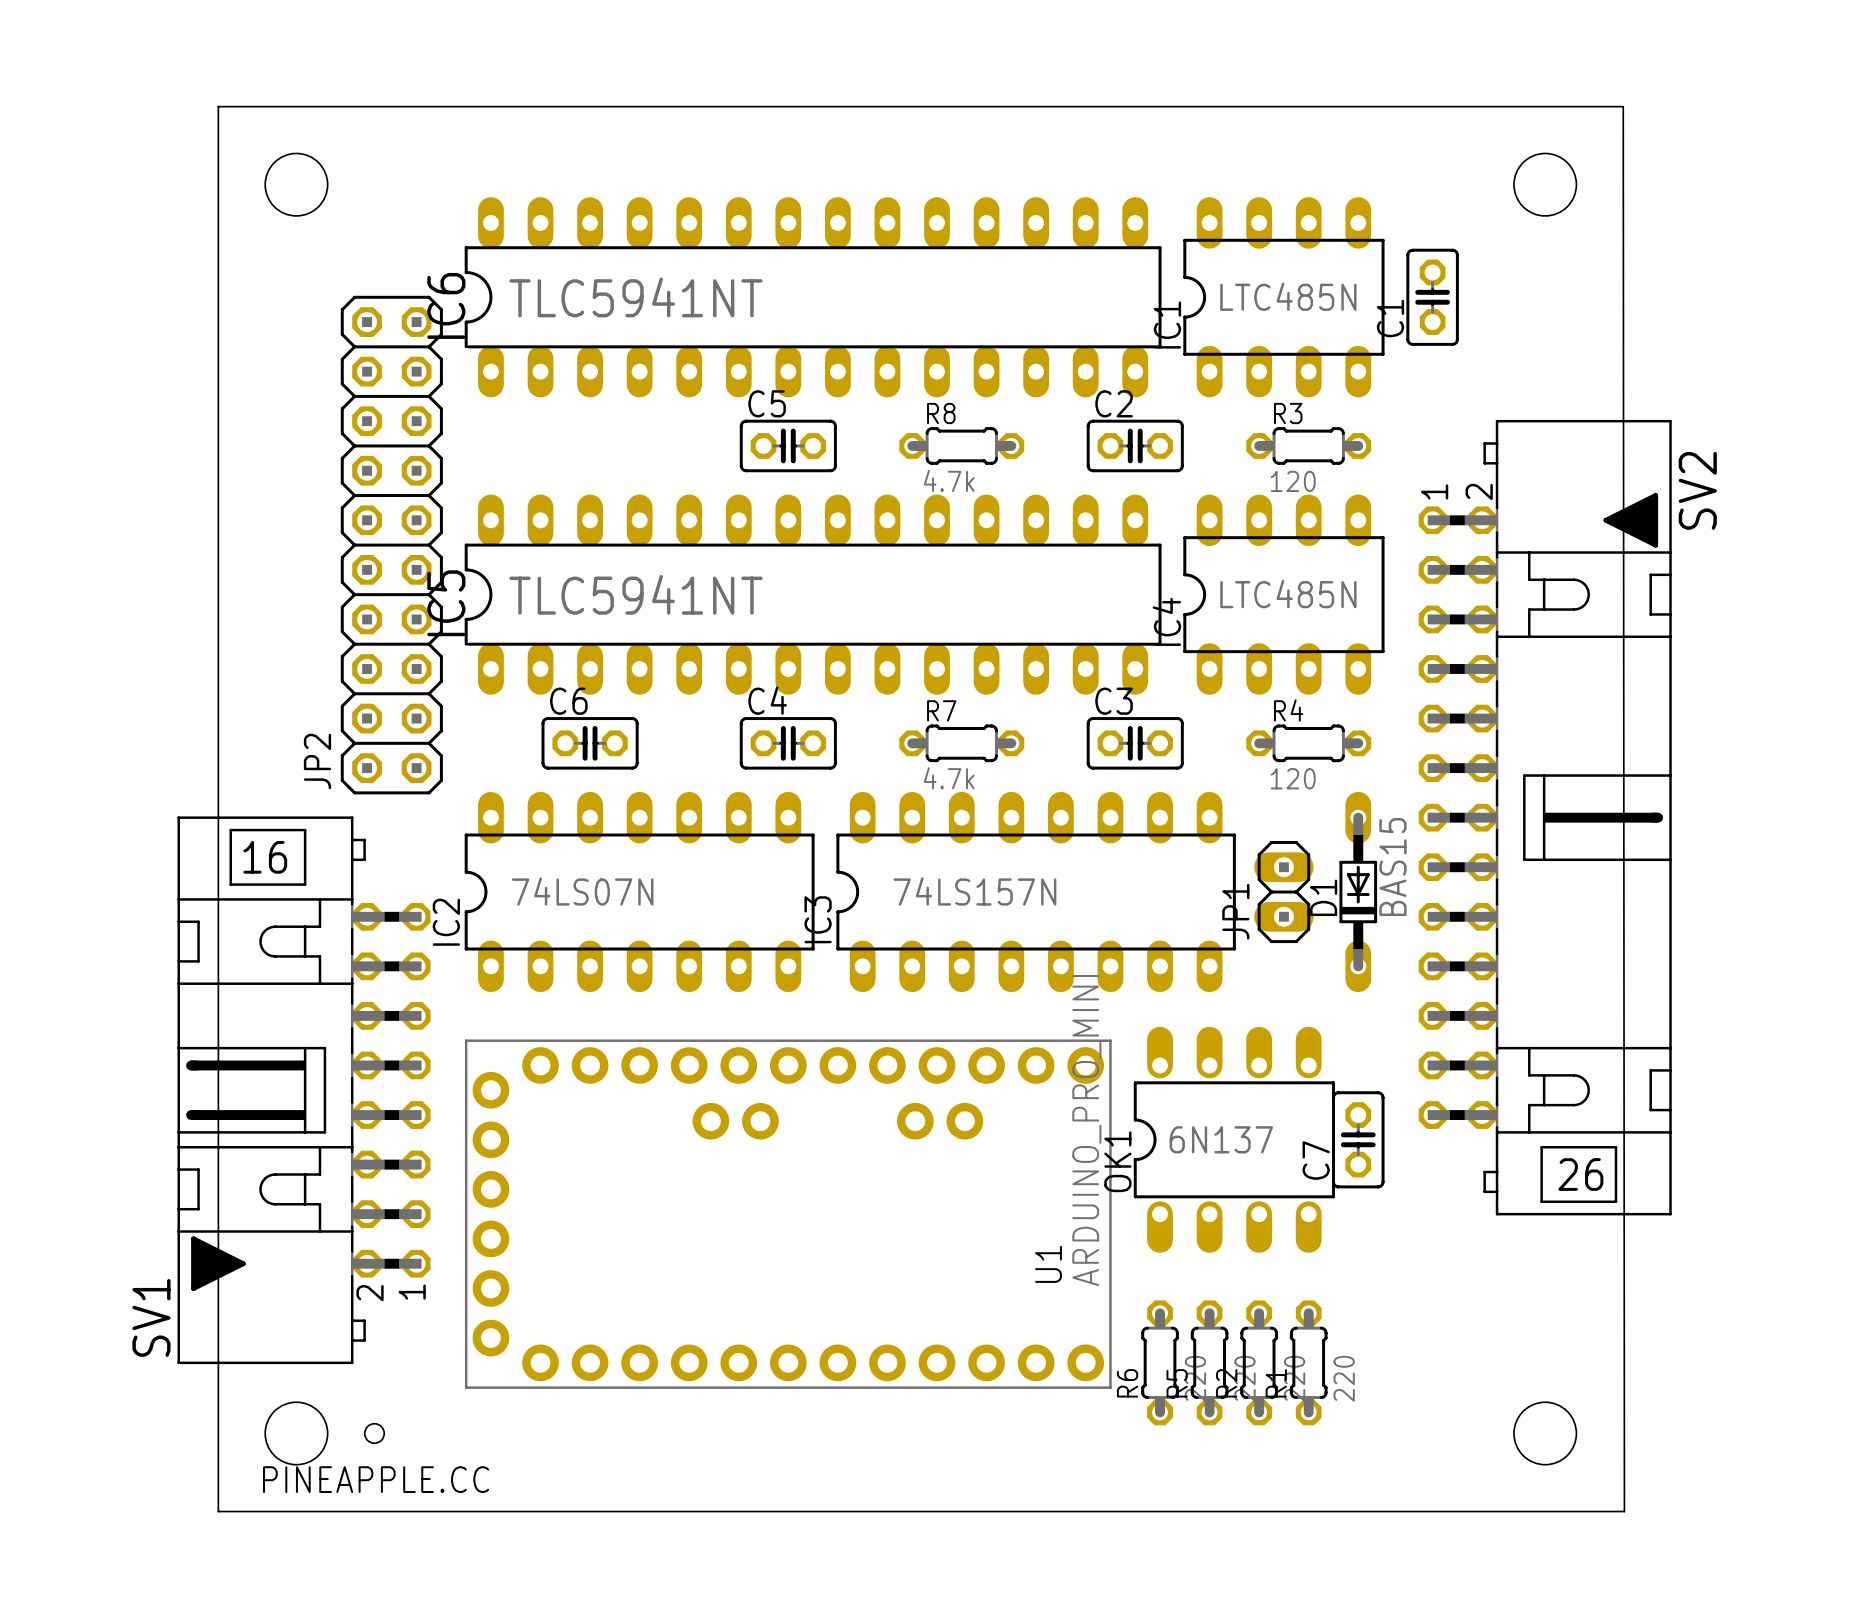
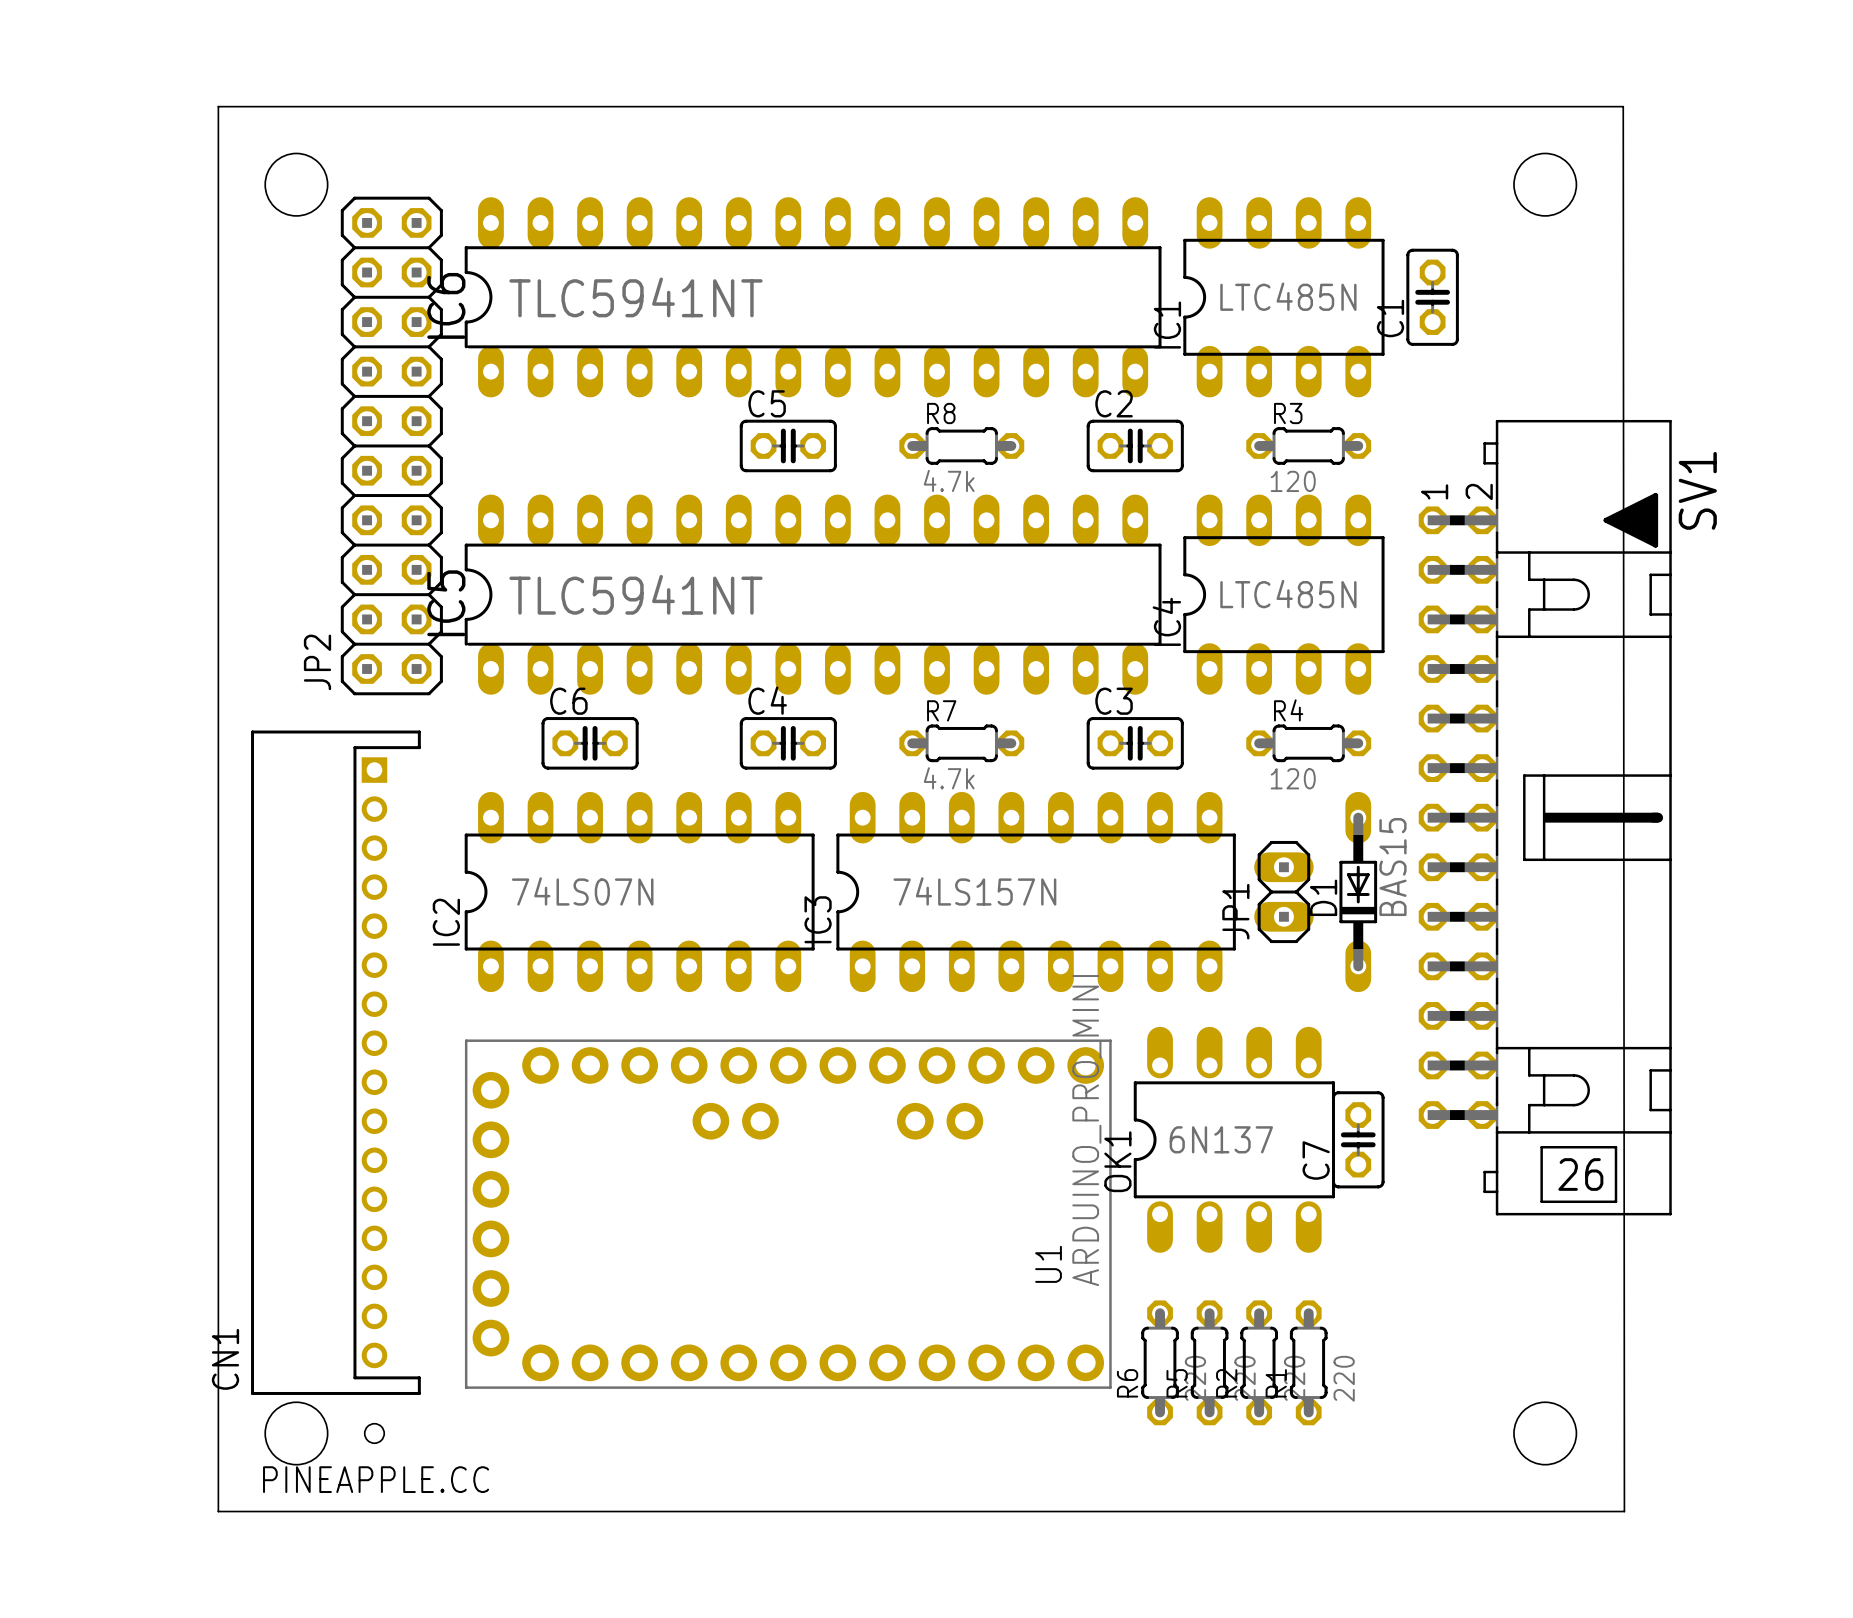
SV2 name: SV2 (1697, 490) -> SV1 (1697, 490)
JP2 position: (391, 545) -> (391, 445)
CN1: none -> (335, 1062)
SV1: (303, 1090) -> none

